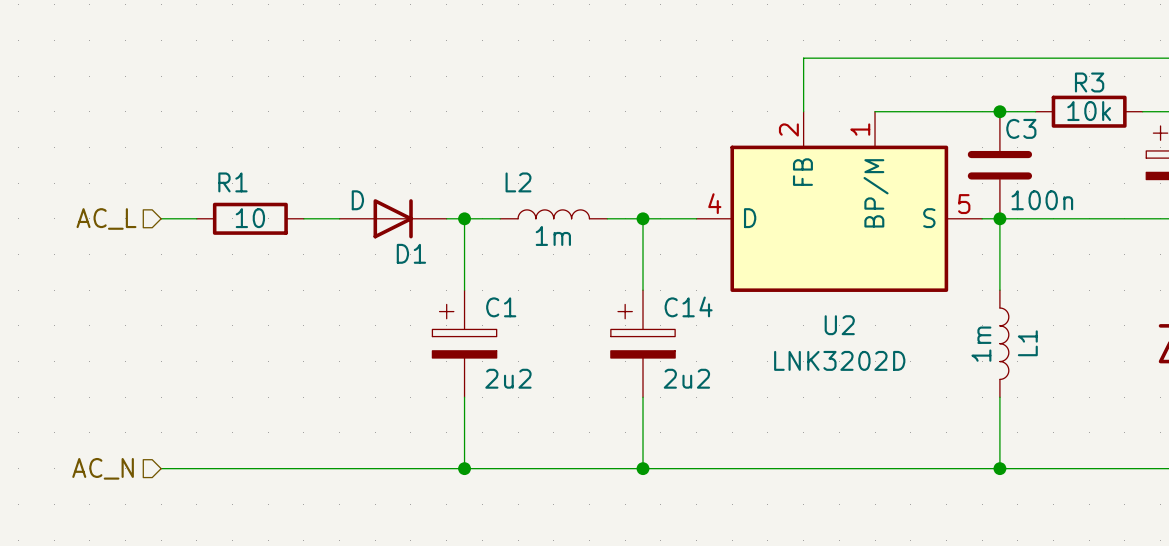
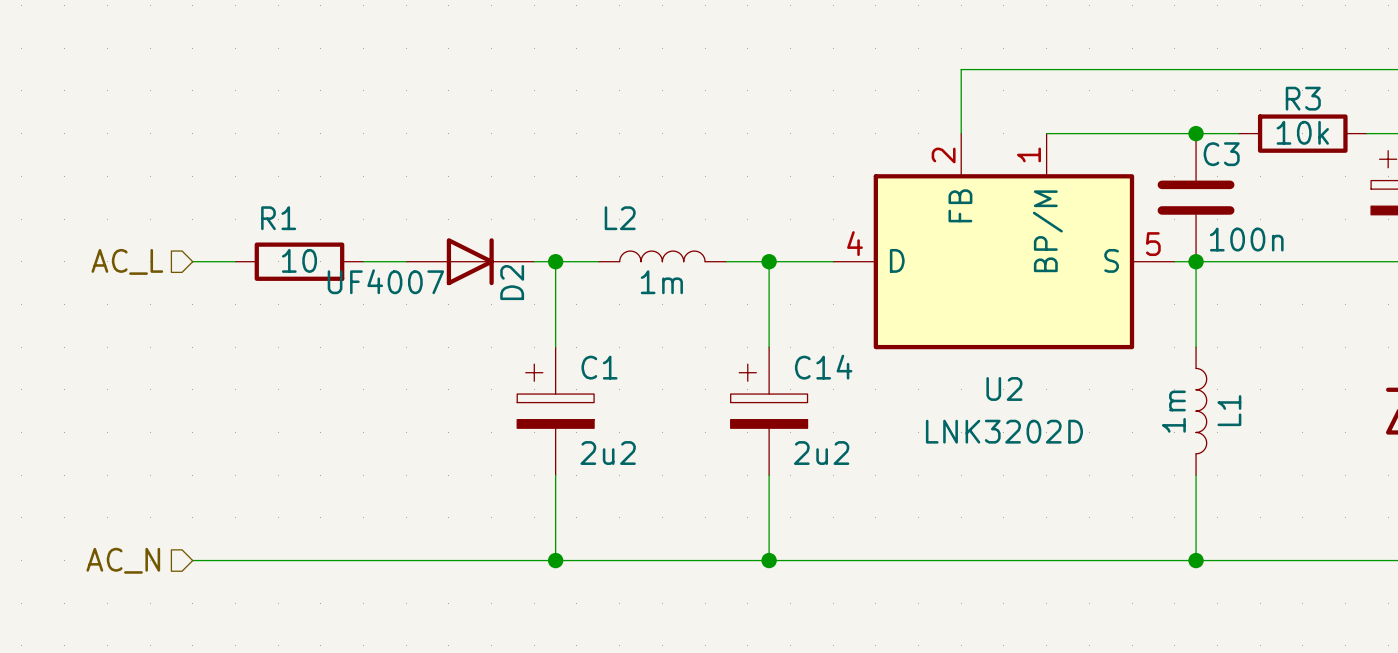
D1 value: D (357, 200) -> UF4007 (385, 281)
D1 name: D1 (411, 253) -> D2 (512, 282)

